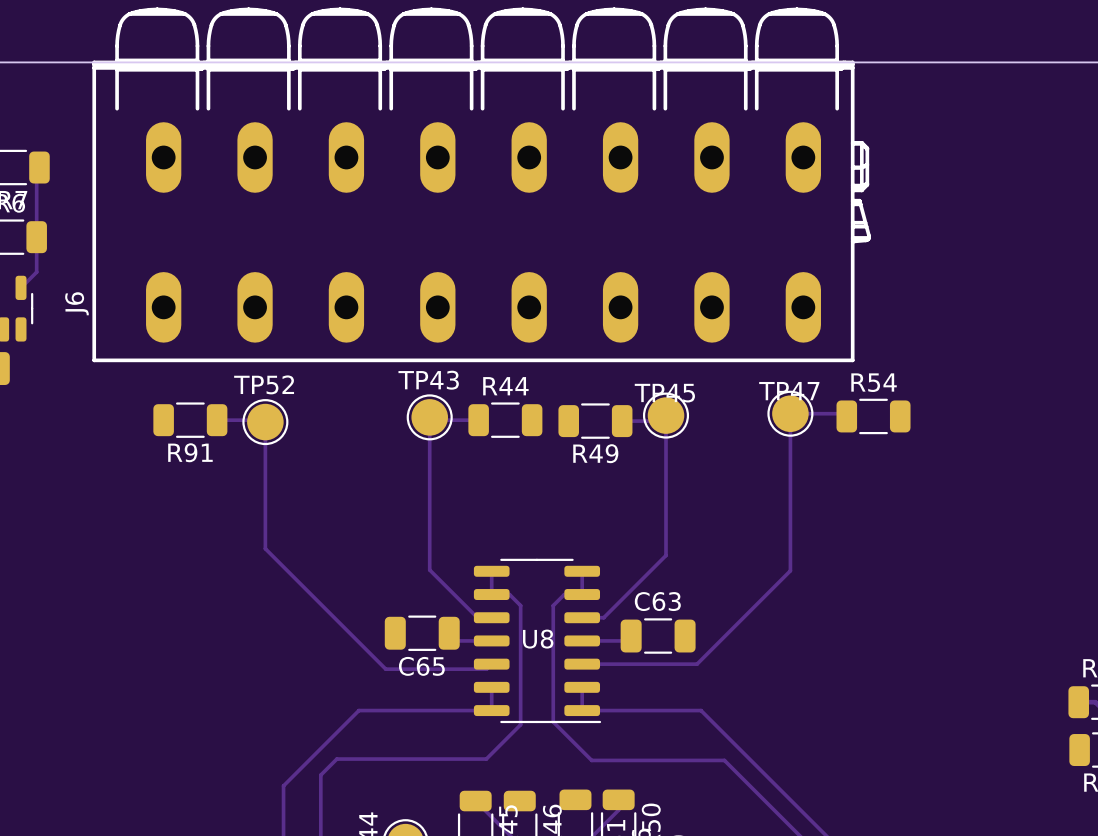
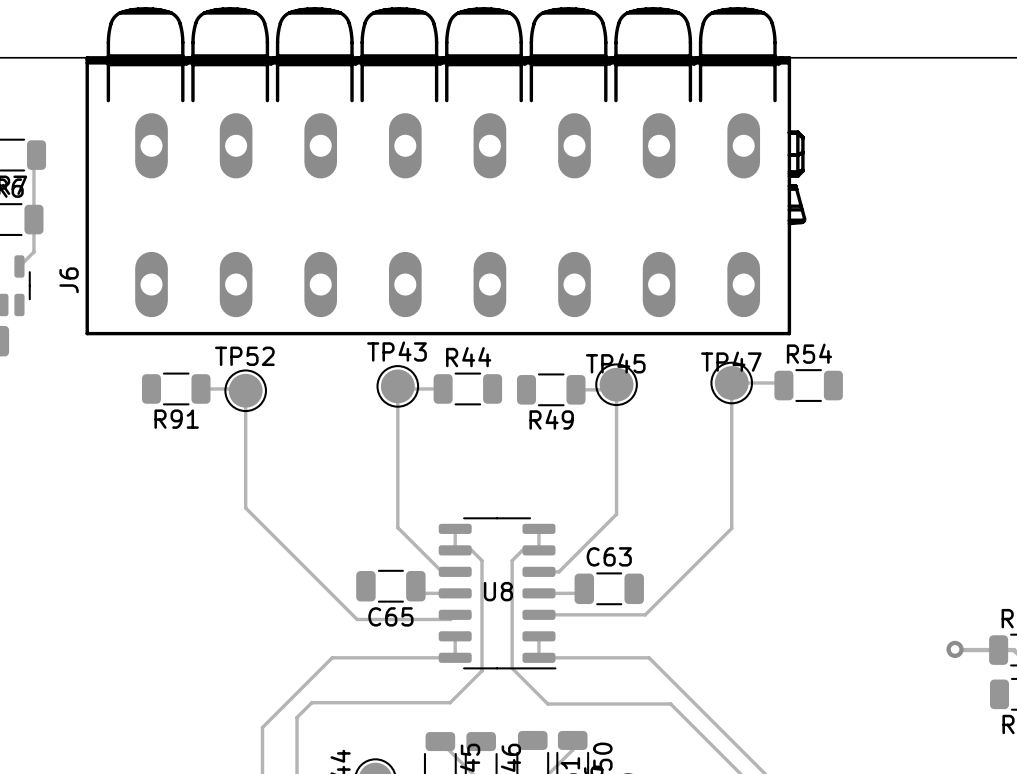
track: none -> (951, 648) (953, 650) (998, 650)
via: none -> (955, 649)

